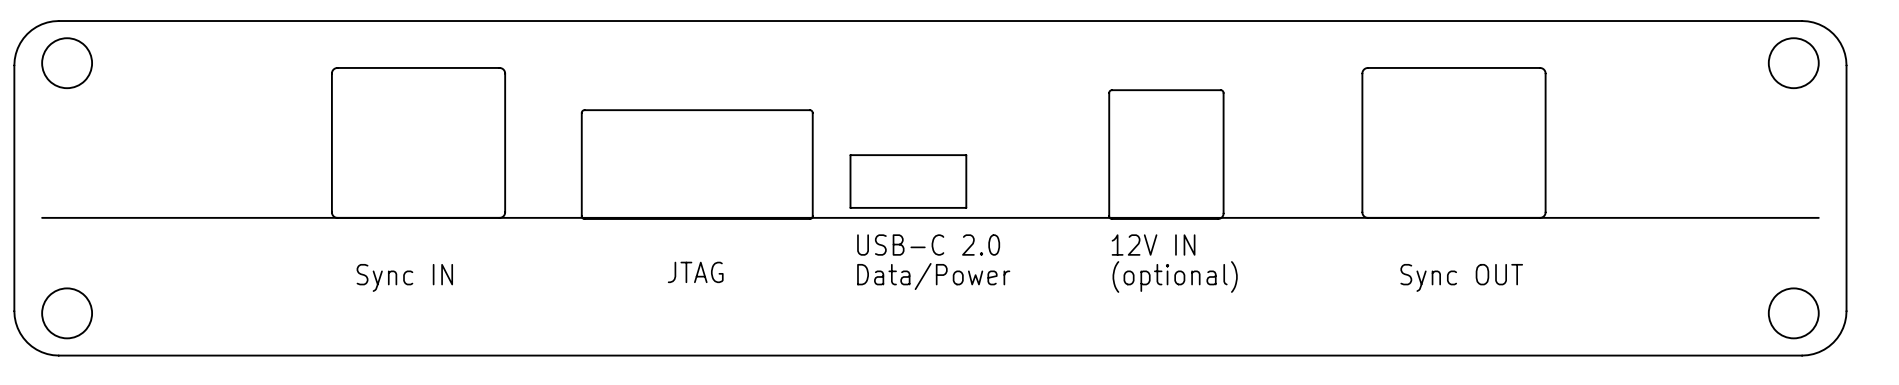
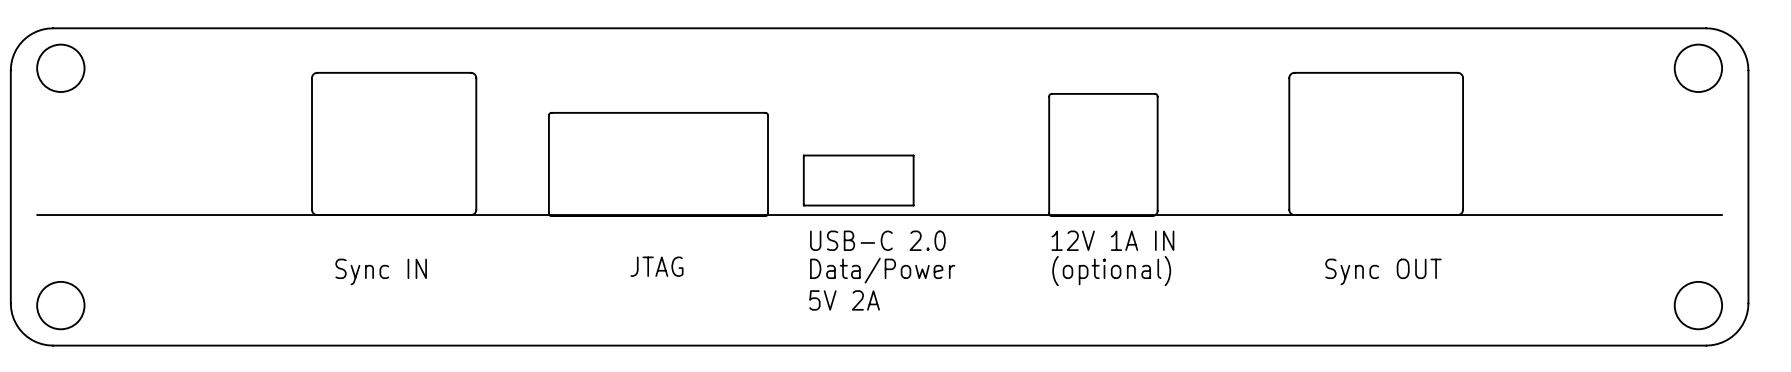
text: 12V IN (1153, 245) -> 12V 1A IN (1112, 240)
text: none -> 5V 2A (844, 300)

